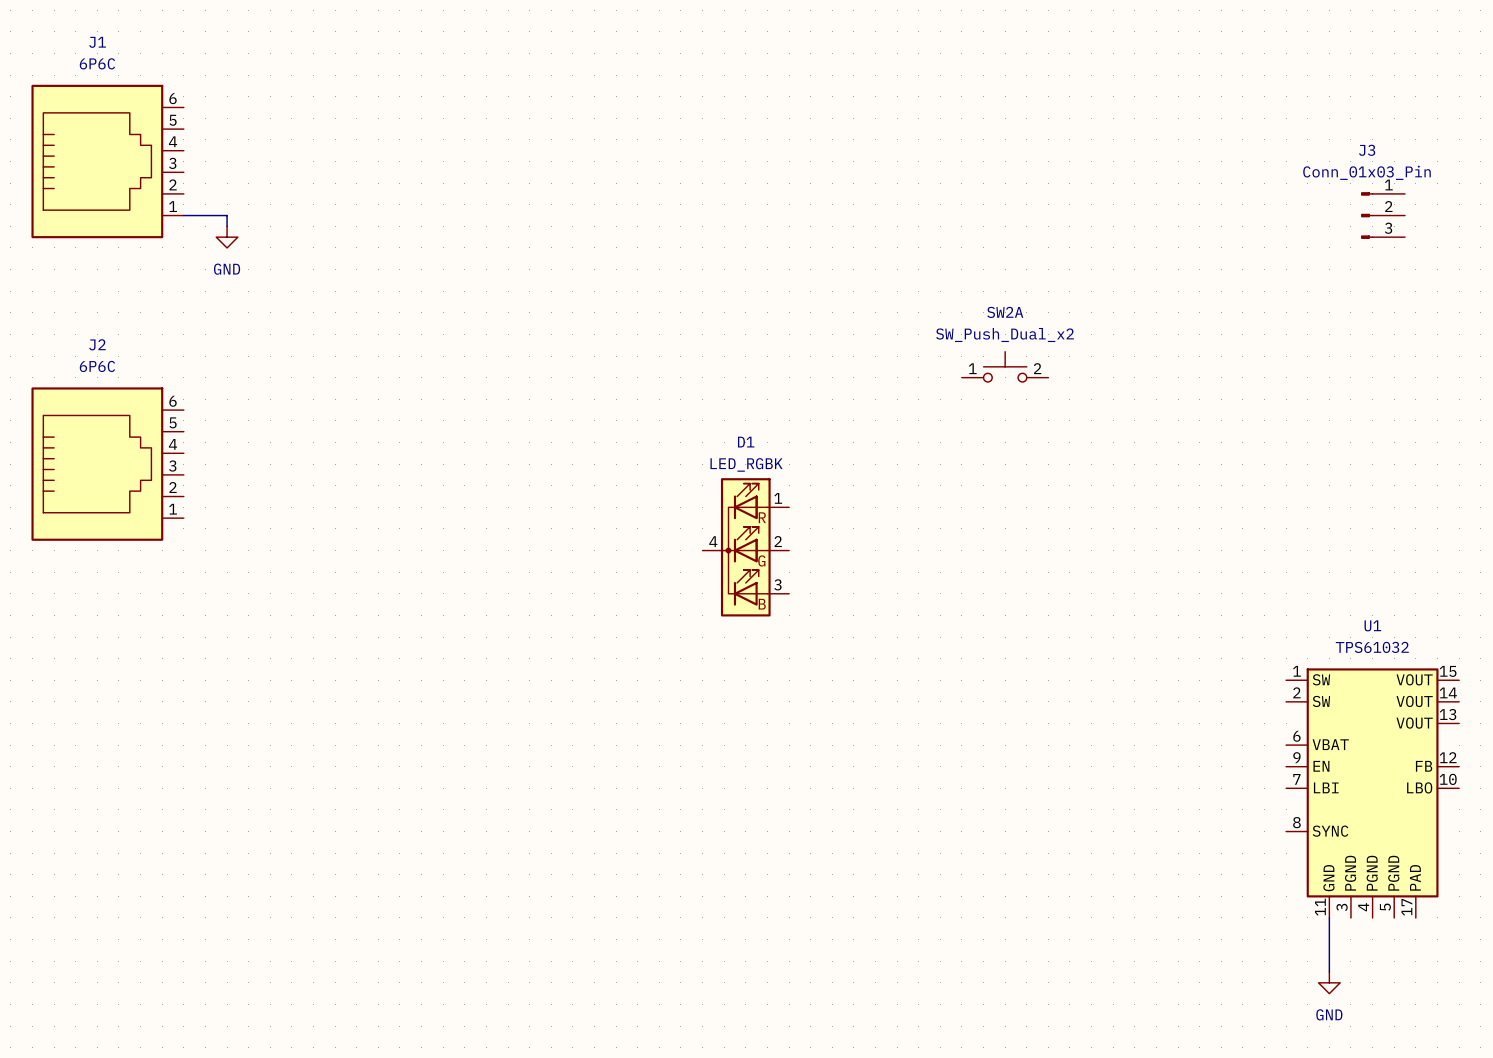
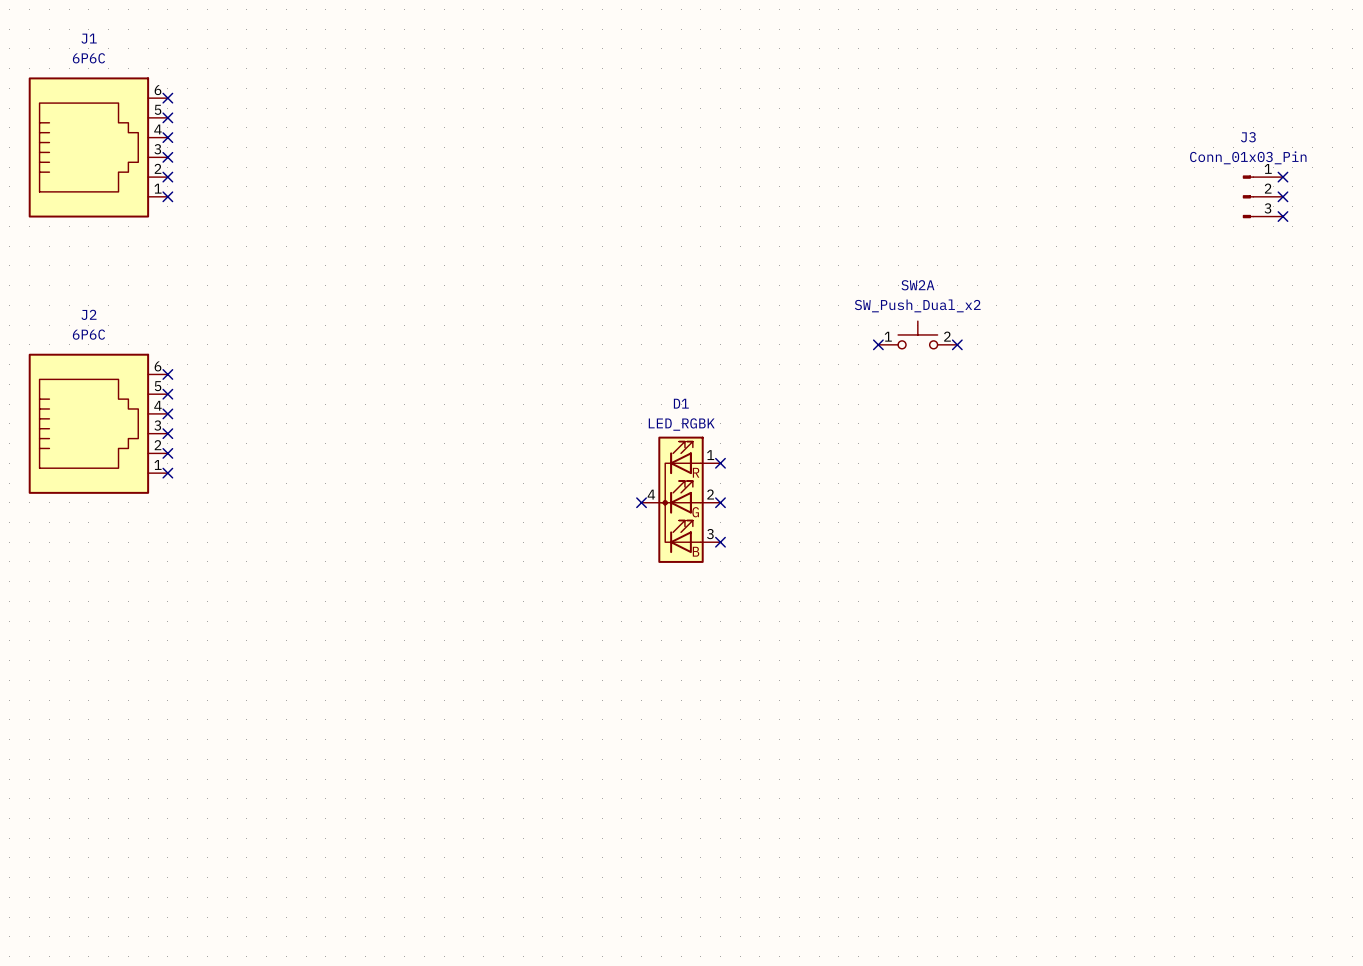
no-connect mark: none -> (167, 98)
no-connect mark: none -> (167, 117)
no-connect mark: none -> (167, 137)
no-connect mark: none -> (167, 157)
no-connect mark: none -> (167, 177)
no-connect mark: none -> (1282, 177)
wire: (183, 215) (227, 215) (227, 226) -> none
no-connect mark: none -> (167, 196)
no-connect mark: none -> (1282, 196)
power symbol: GND (227, 237) -> none
no-connect mark: none -> (1282, 216)
no-connect mark: none -> (878, 344)
no-connect mark: none -> (957, 344)
no-connect mark: none -> (167, 374)
no-connect mark: none -> (167, 394)
no-connect mark: none -> (167, 413)
no-connect mark: none -> (167, 433)
no-connect mark: none -> (167, 453)
no-connect mark: none -> (720, 463)
no-connect mark: none -> (167, 473)
no-connect mark: none -> (641, 502)
no-connect mark: none -> (720, 502)
no-connect mark: none -> (720, 542)
U1: TPS61032 (1372, 793) -> none
wire: (1329, 917) (1329, 972) -> none
power symbol: GND (1329, 982) -> none

